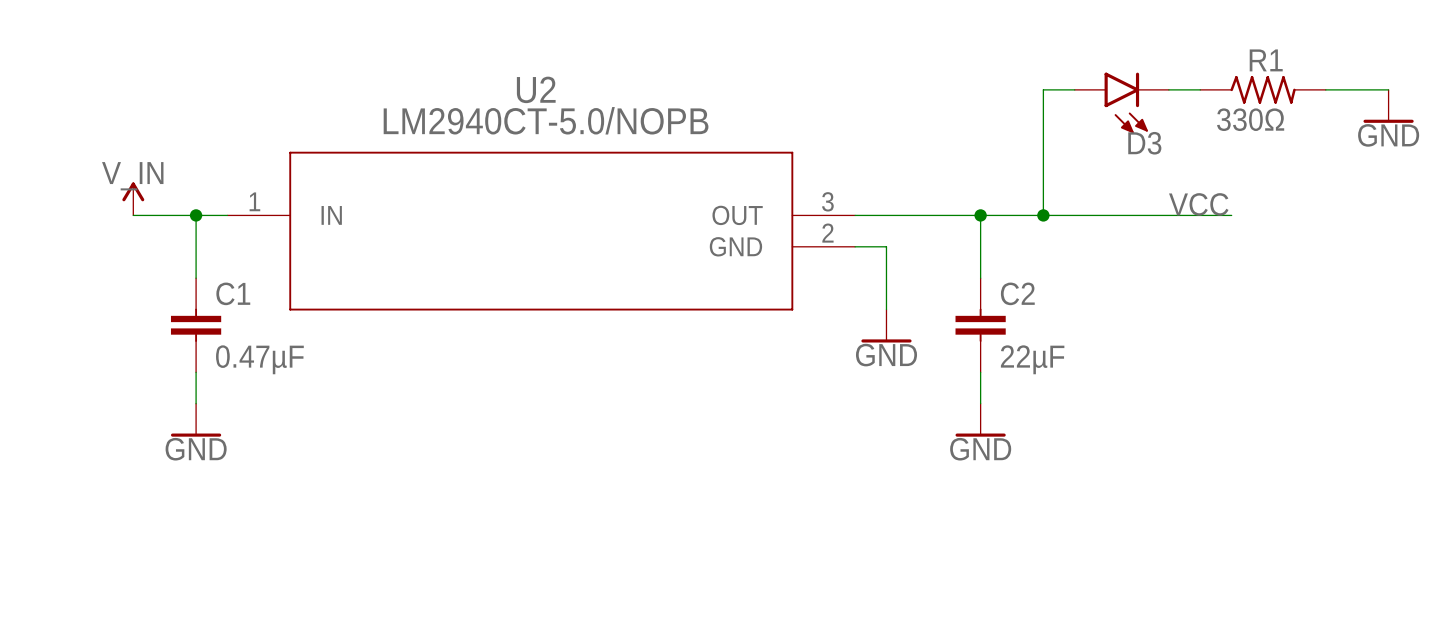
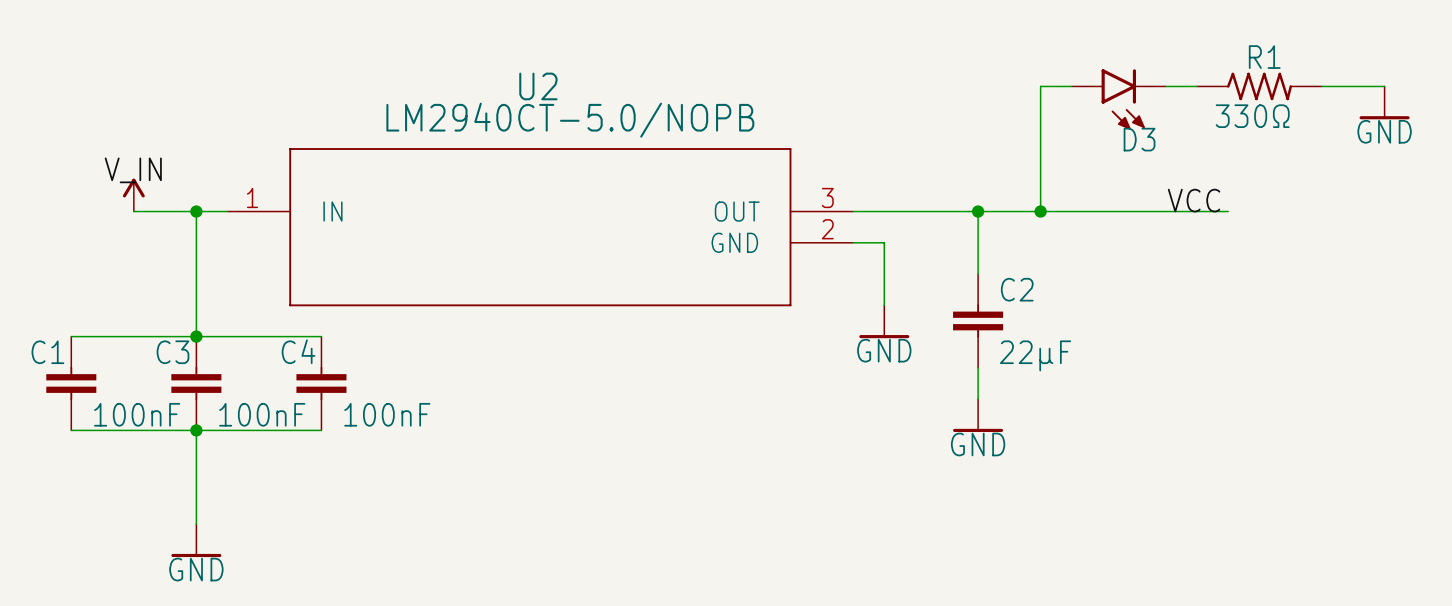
C1 name position: C1 (233, 293) -> C1 (47, 352)
C1 position: (196, 325) -> (71, 383)
wire: none -> (71, 336) (321, 336)
junction: none -> (196, 336)
C1 value: 0.47µF (259, 359) -> 100nF (137, 414)
C3: none -> 100nF (196, 383)
C4: none -> 100nF (321, 383)
power symbol position: GND (196, 420) -> GND (196, 540)
wire: none -> (71, 430) (321, 430)
wire: none -> (196, 430) (196, 524)
junction: none -> (196, 430)

